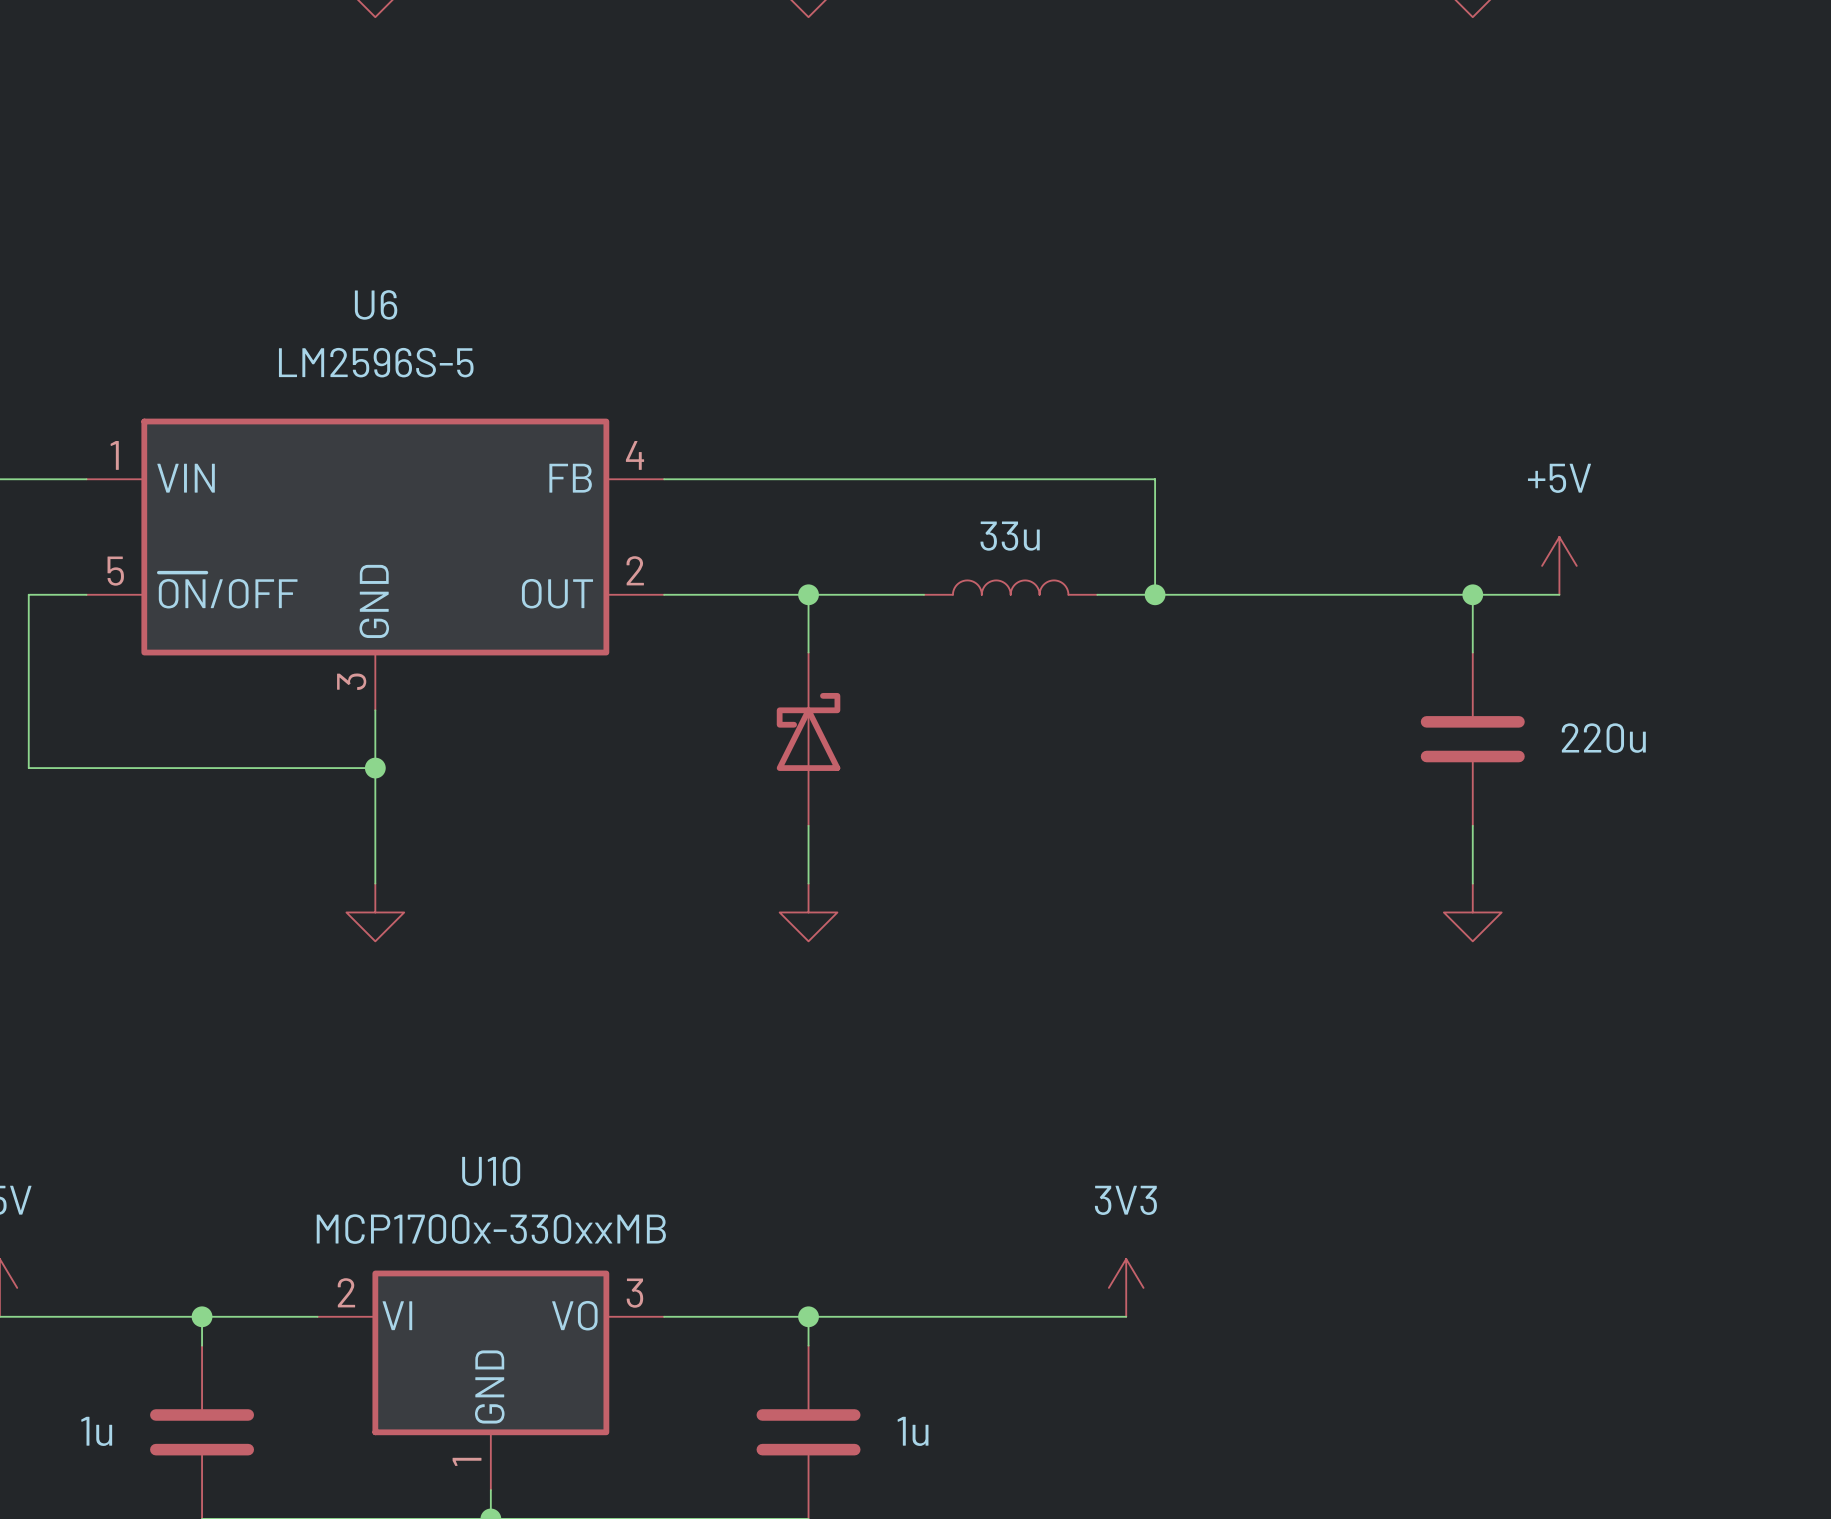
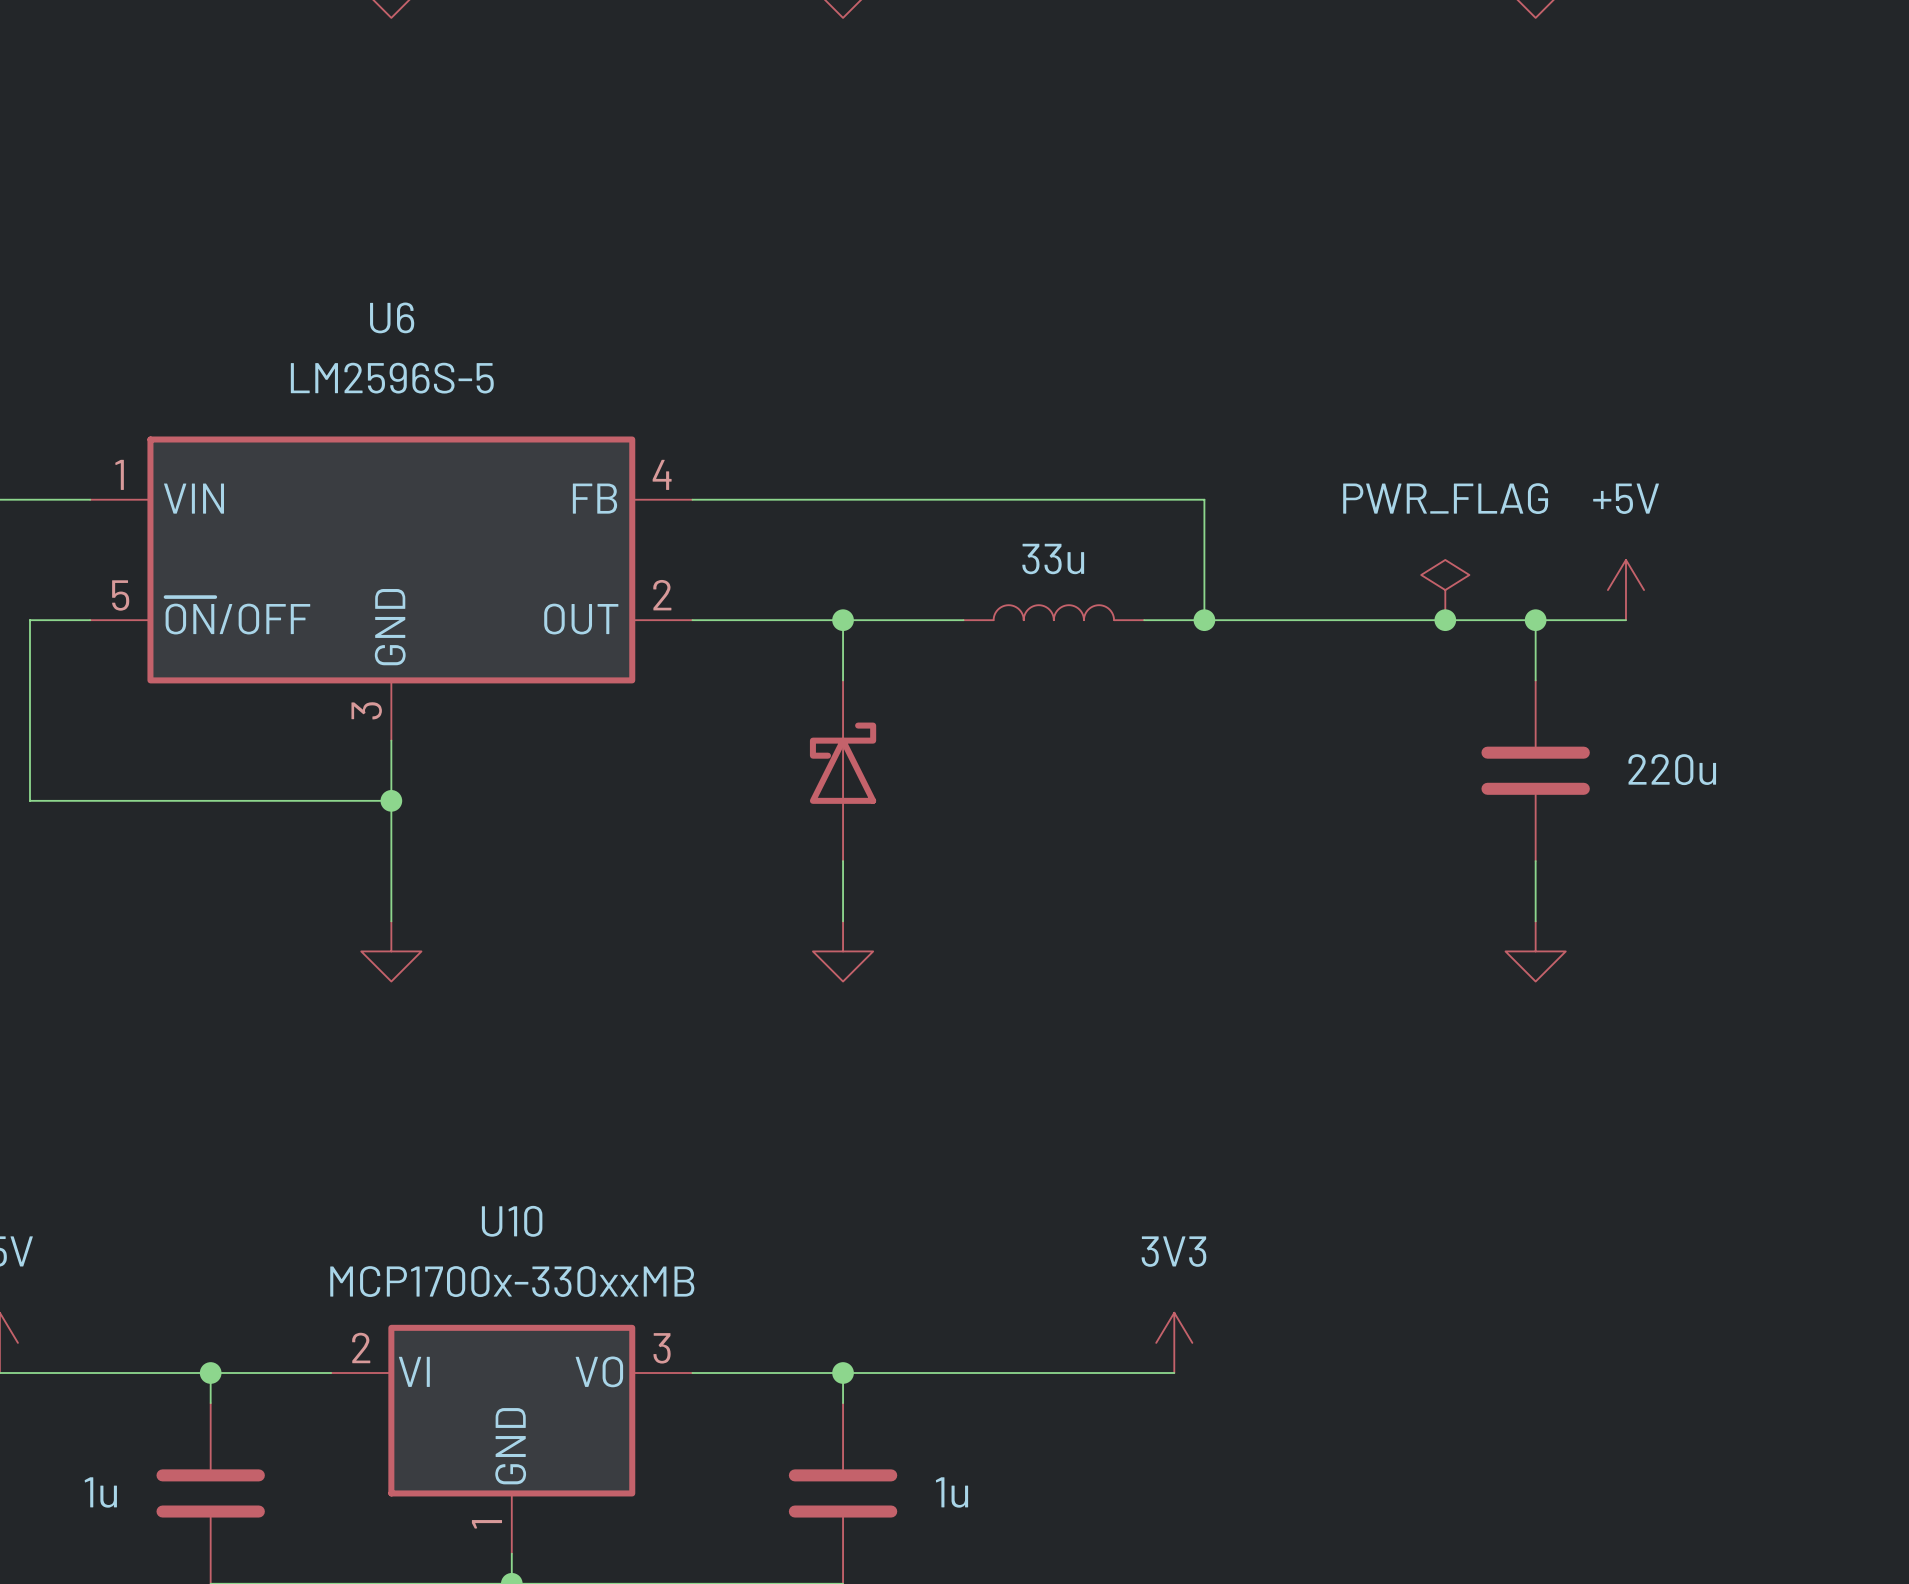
power symbol: none -> PWR_FLAG (1445, 590)
junction: none -> (1445, 620)

